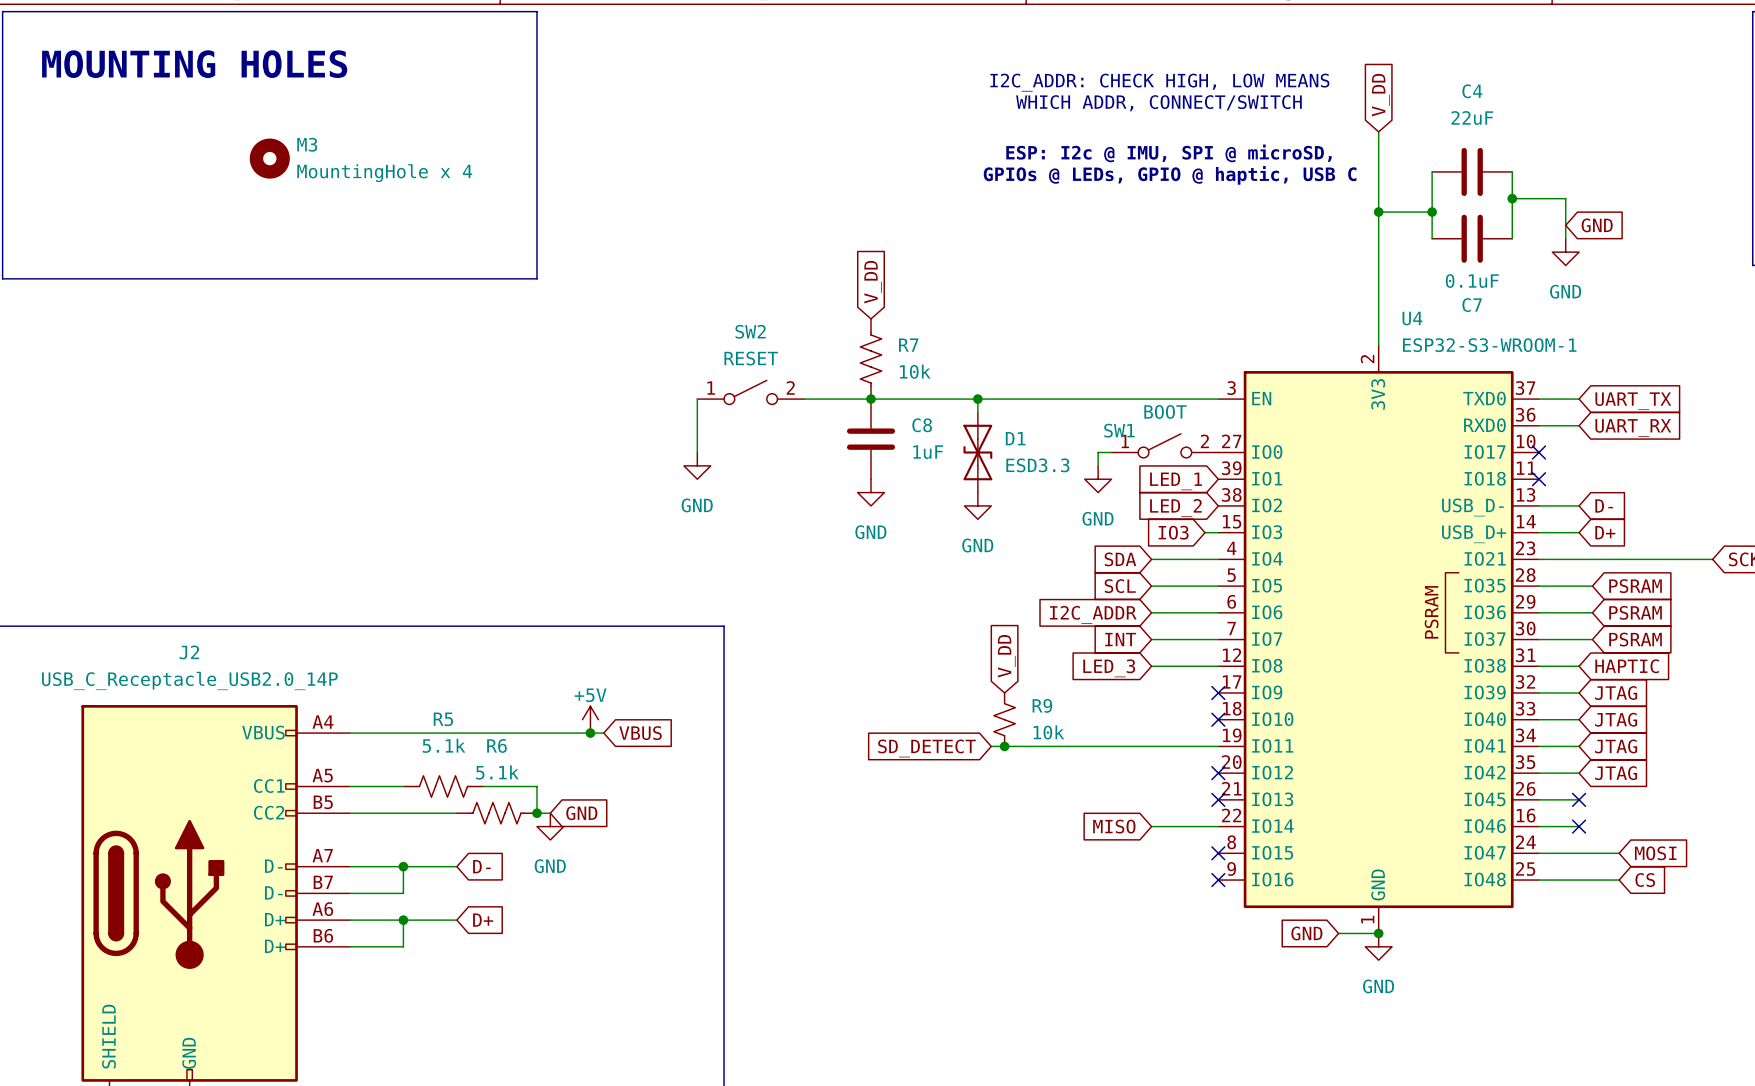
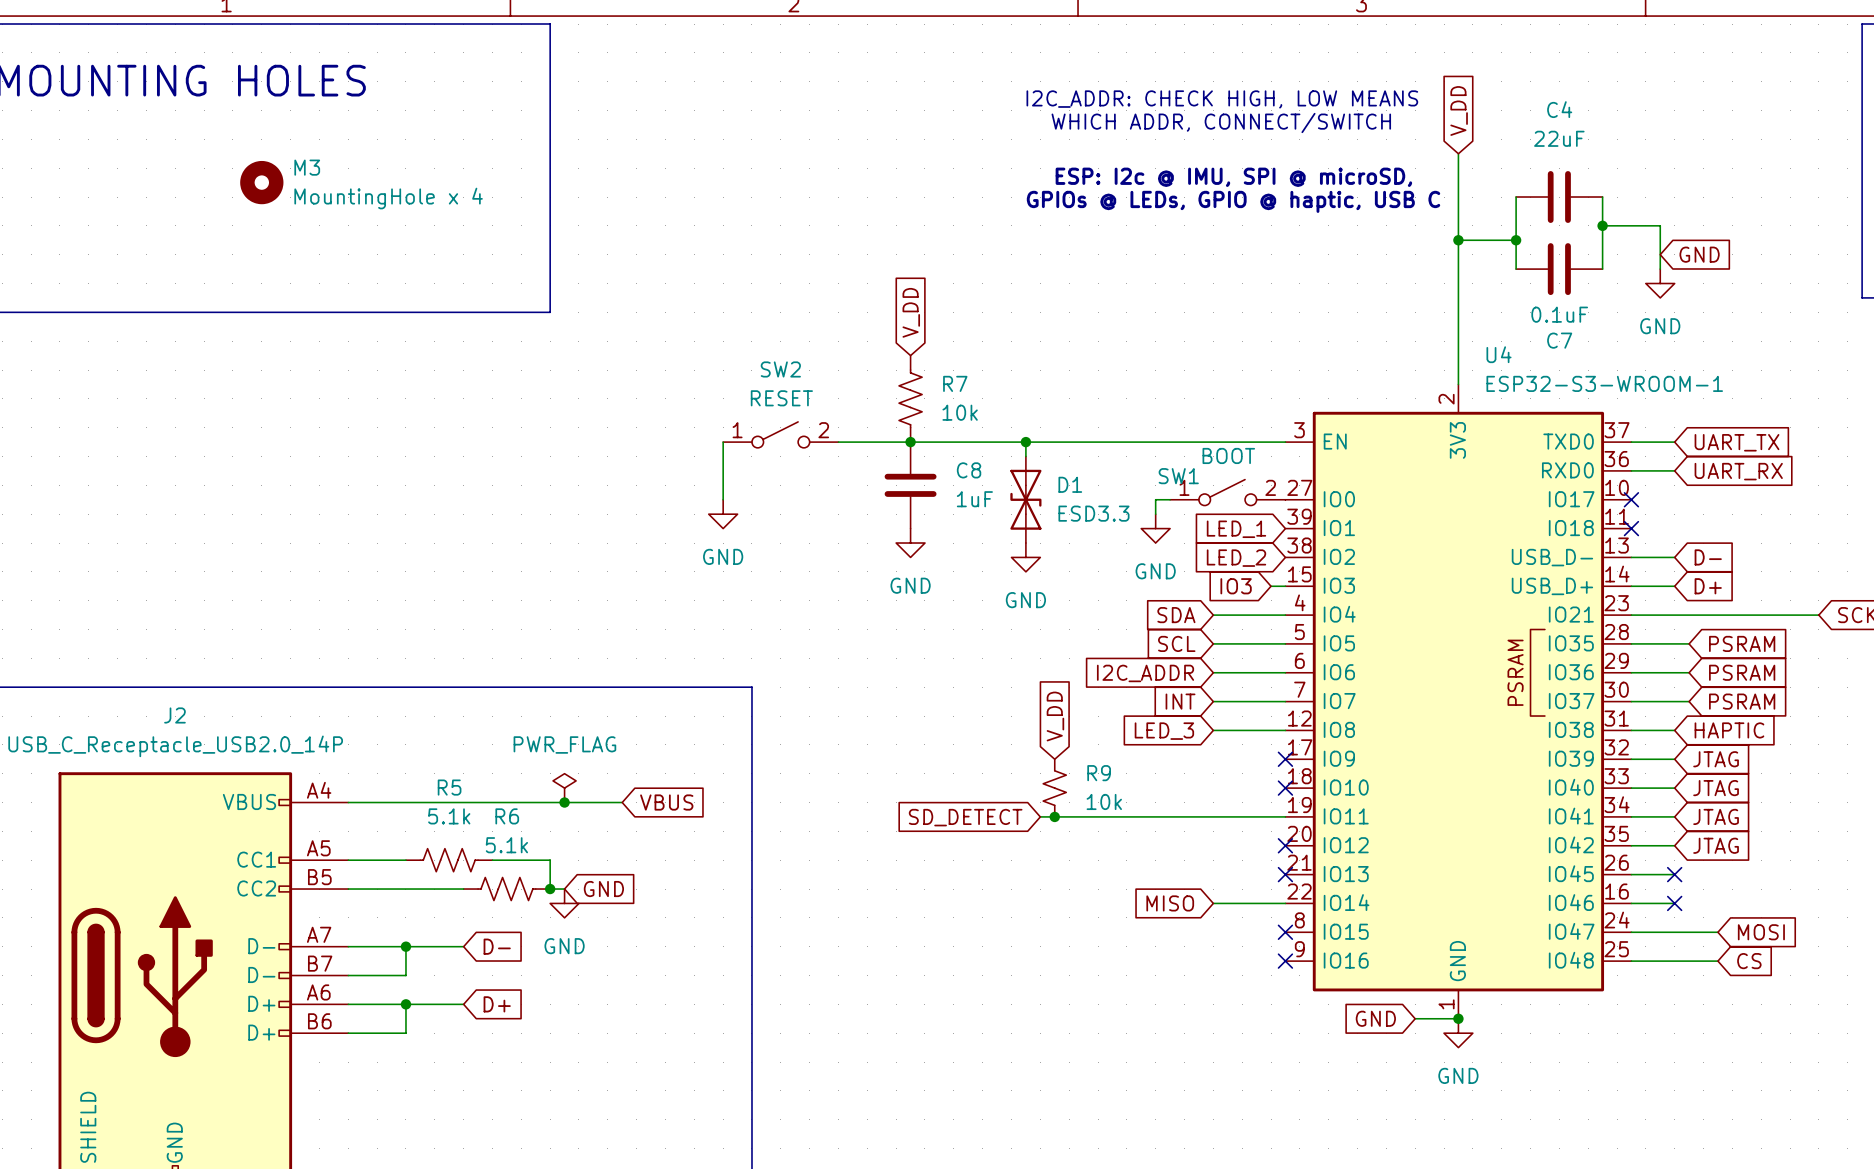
power symbol: none -> PWR_FLAG (564, 788)
power symbol: +5V (590, 719) -> none
junction position: (590, 733) -> (564, 802)

